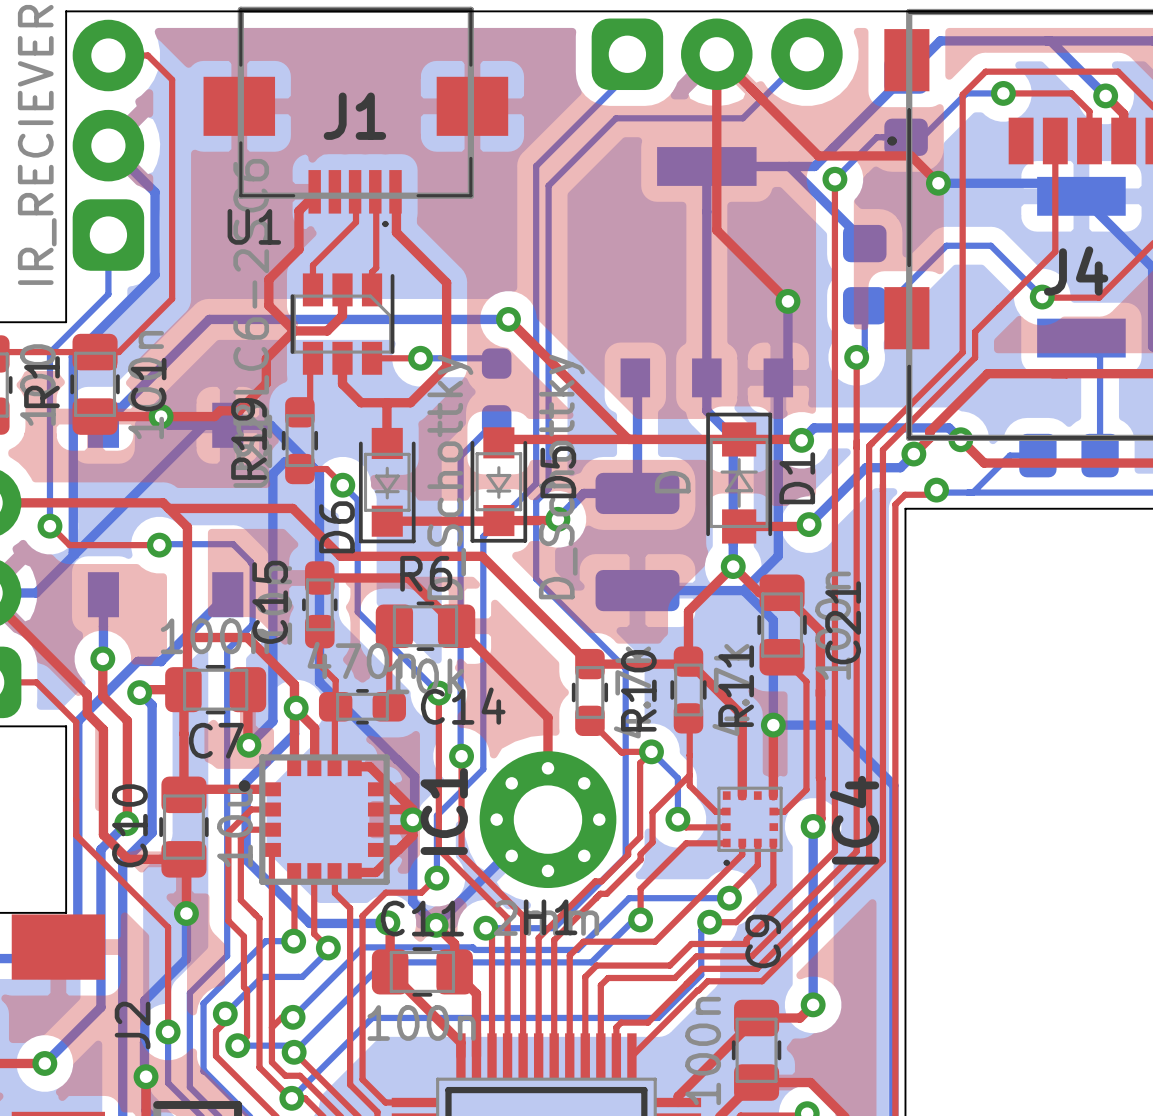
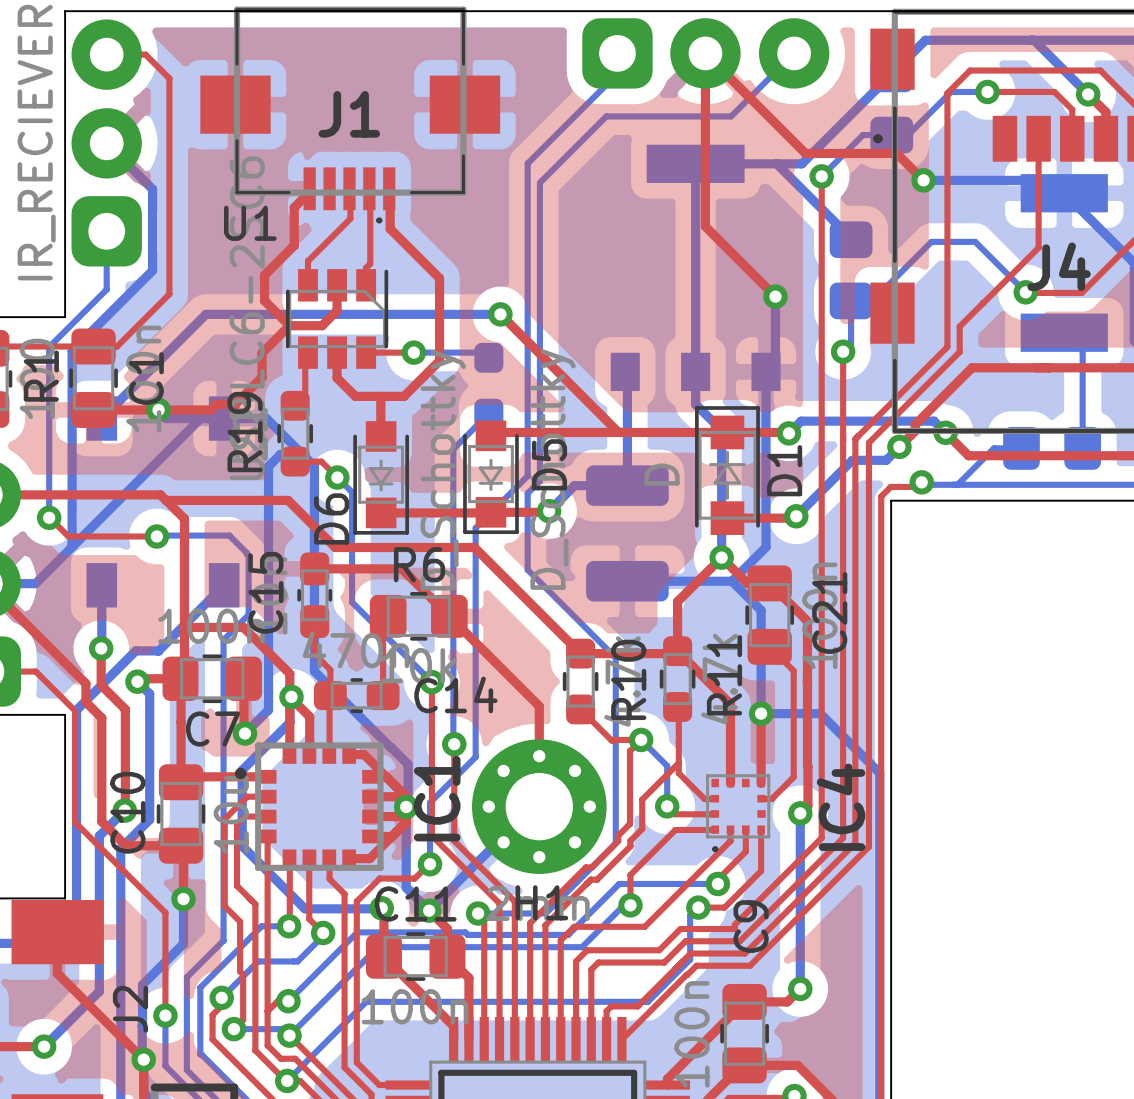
top track: none -> (57, 932) (57, 973) (143, 1059)

